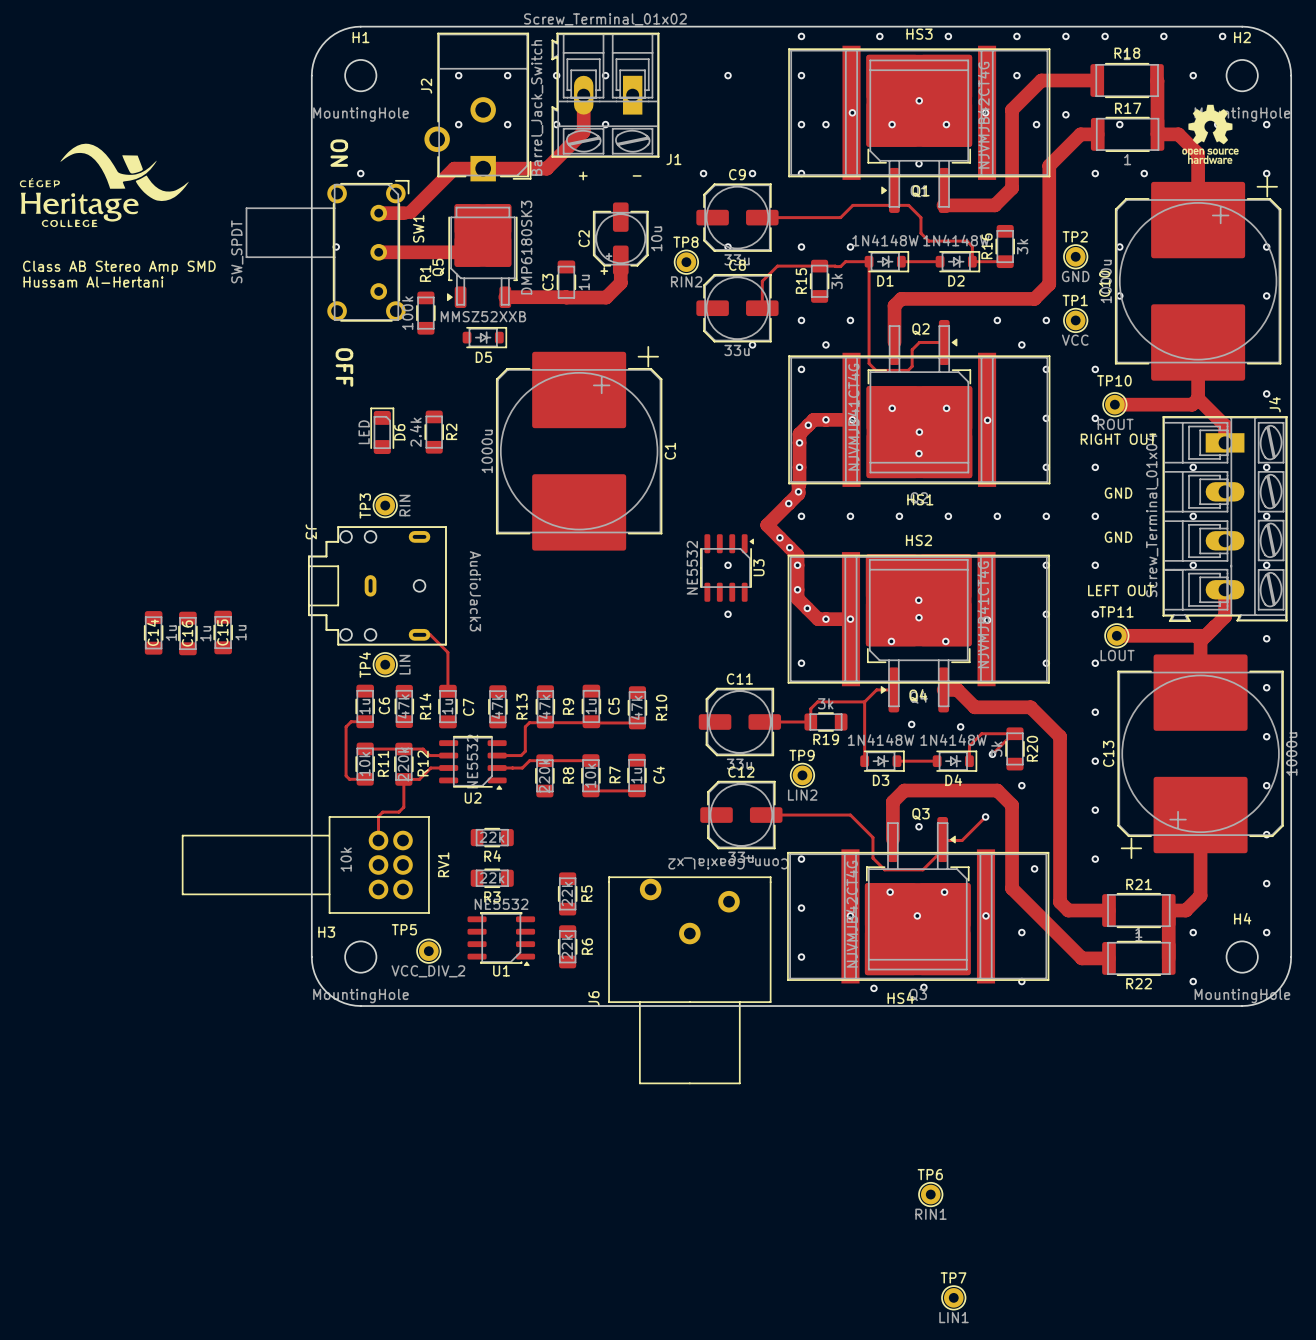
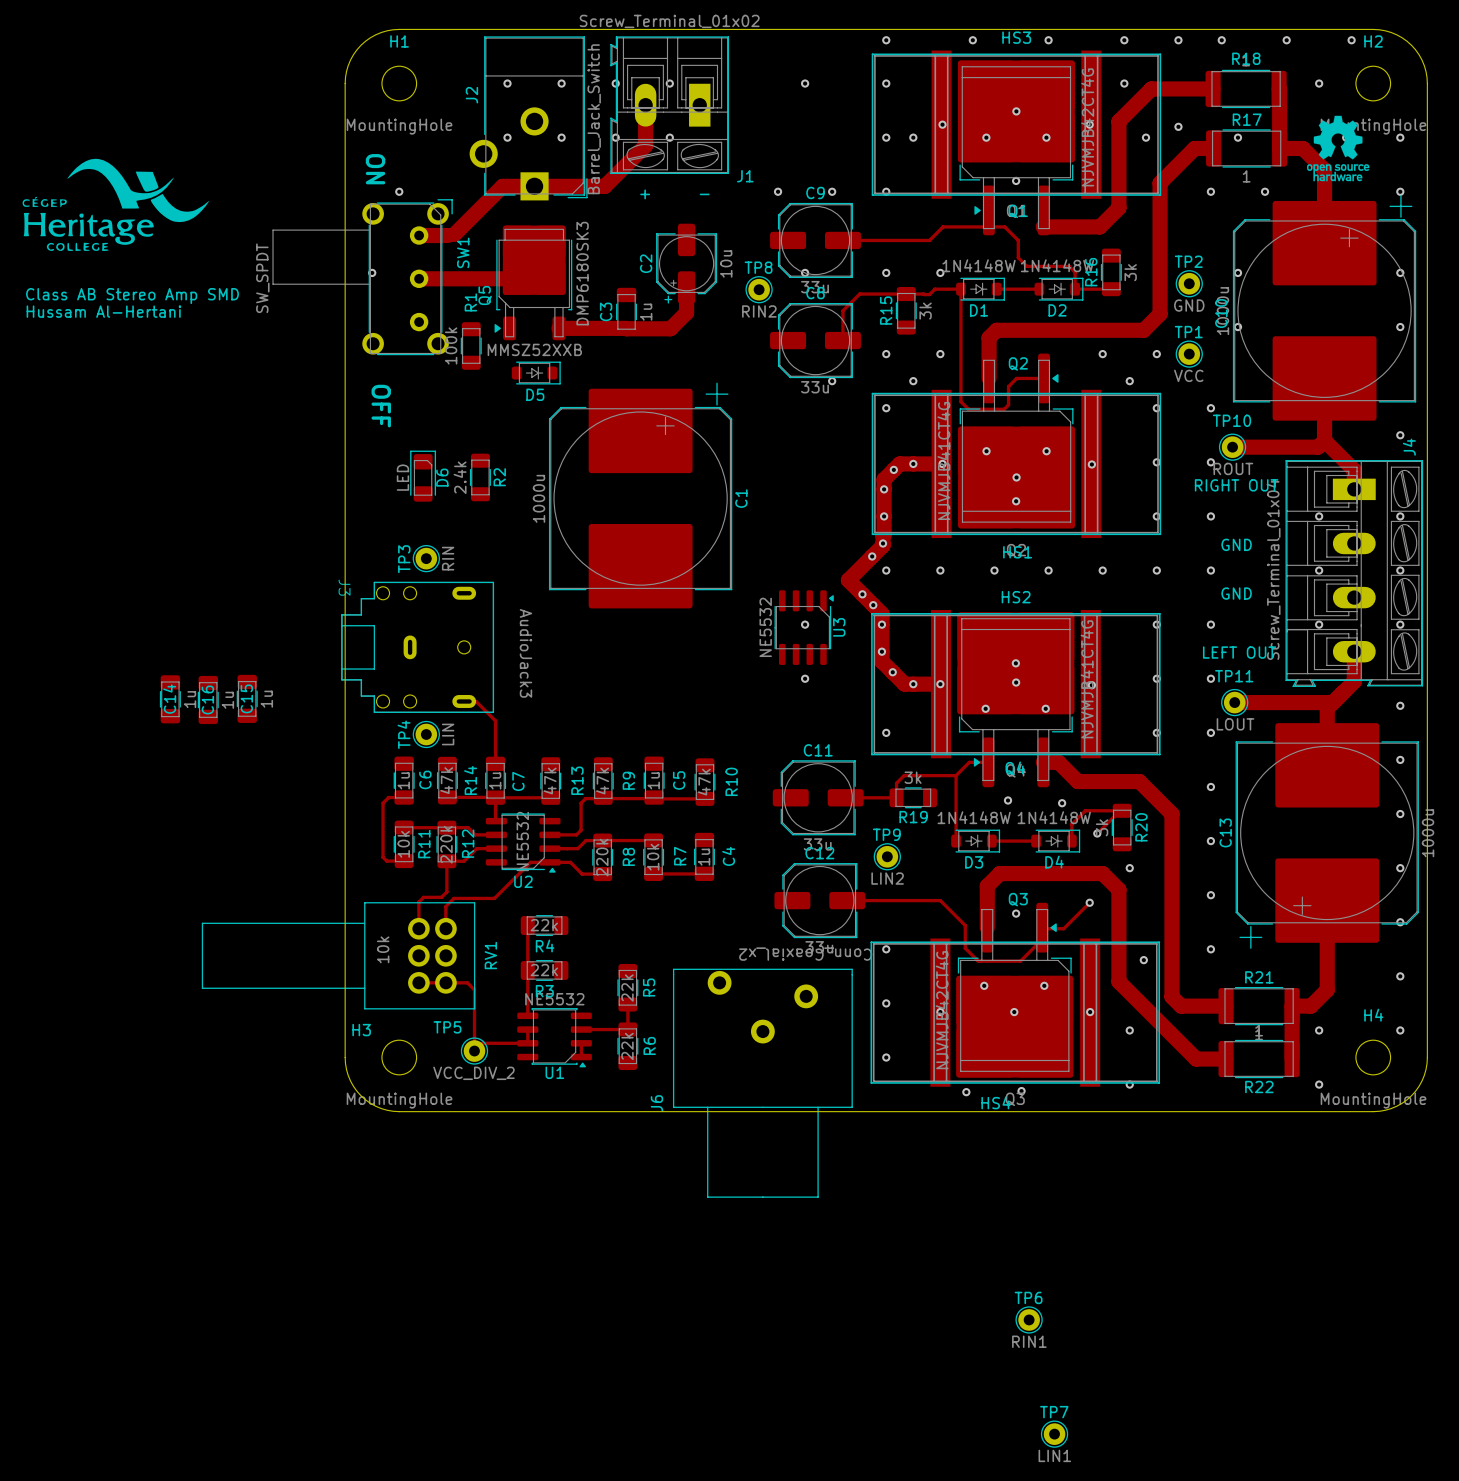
track: none -> (447, 797) (550, 797)
track: none -> (495, 797) (496, 821)
track: none -> (602, 874) (582, 874) (570, 862) (530, 862) (494, 898) (453, 898) (445, 906) (445, 928)
track: none -> (527, 925) (527, 1015)
track: none -> (418, 982) (467, 982) (474, 989) (474, 1051) (482, 1043) (527, 1043) (527, 1029)
track: none -> (627, 1004) (627, 1029)
track: none -> (581, 1029) (627, 1029)
track: none -> (581, 1043) (581, 1057)

